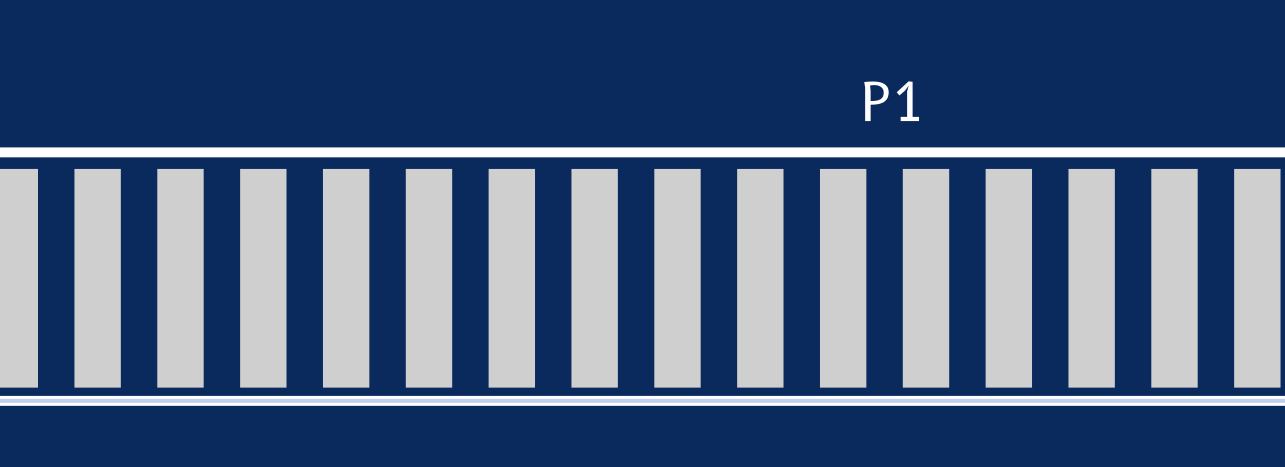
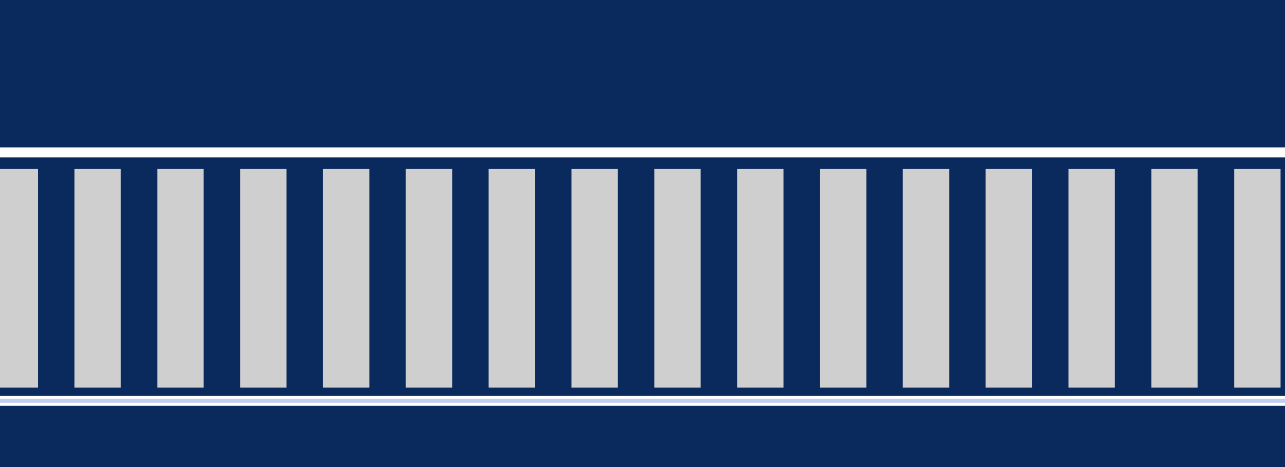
P1 name: P1 (891, 101) -> none

